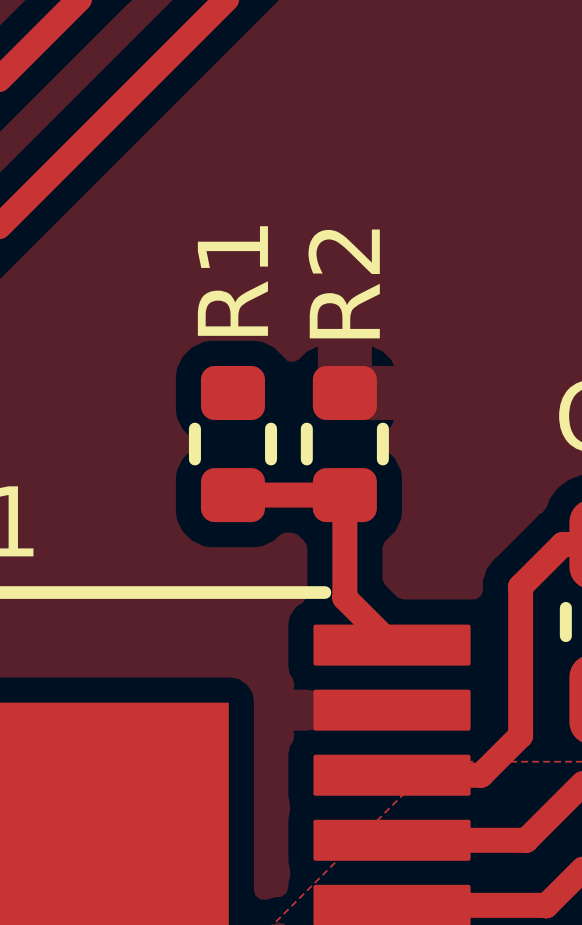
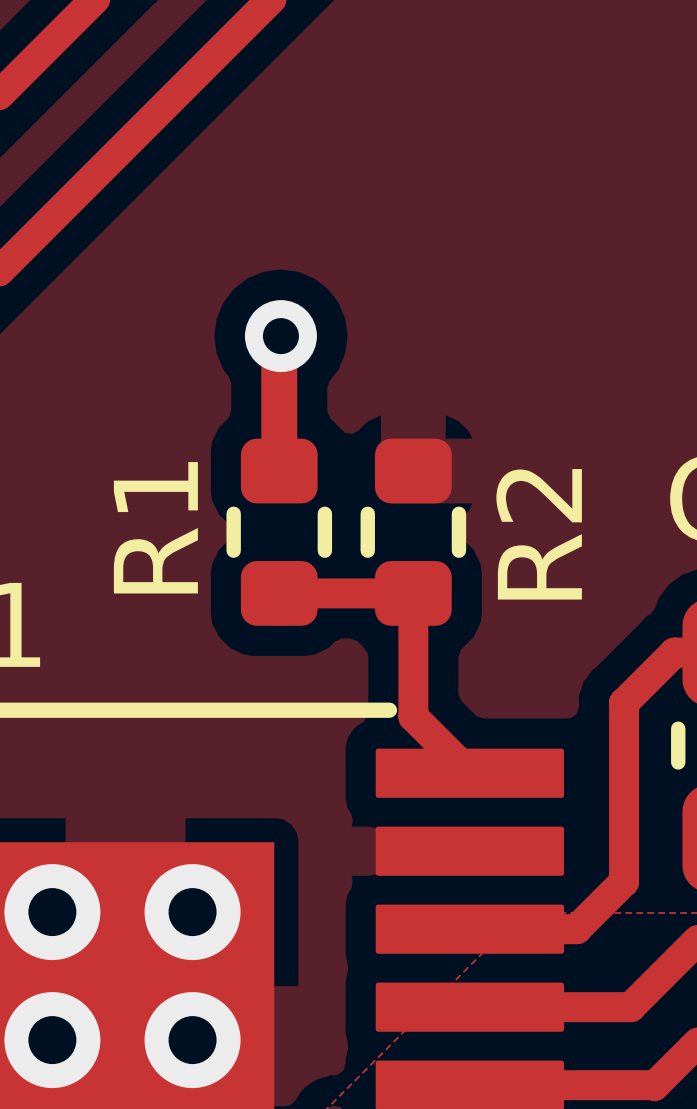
via: none -> (280, 336)
track: none -> (279, 337) (279, 471)
R1 name position: R1 (232, 281) -> R1 (155, 527)
R2 name position: R2 (344, 283) -> R2 (539, 534)
via: none -> (52, 912)
via: none -> (192, 912)
via: none -> (52, 1040)
via: none -> (192, 1040)

